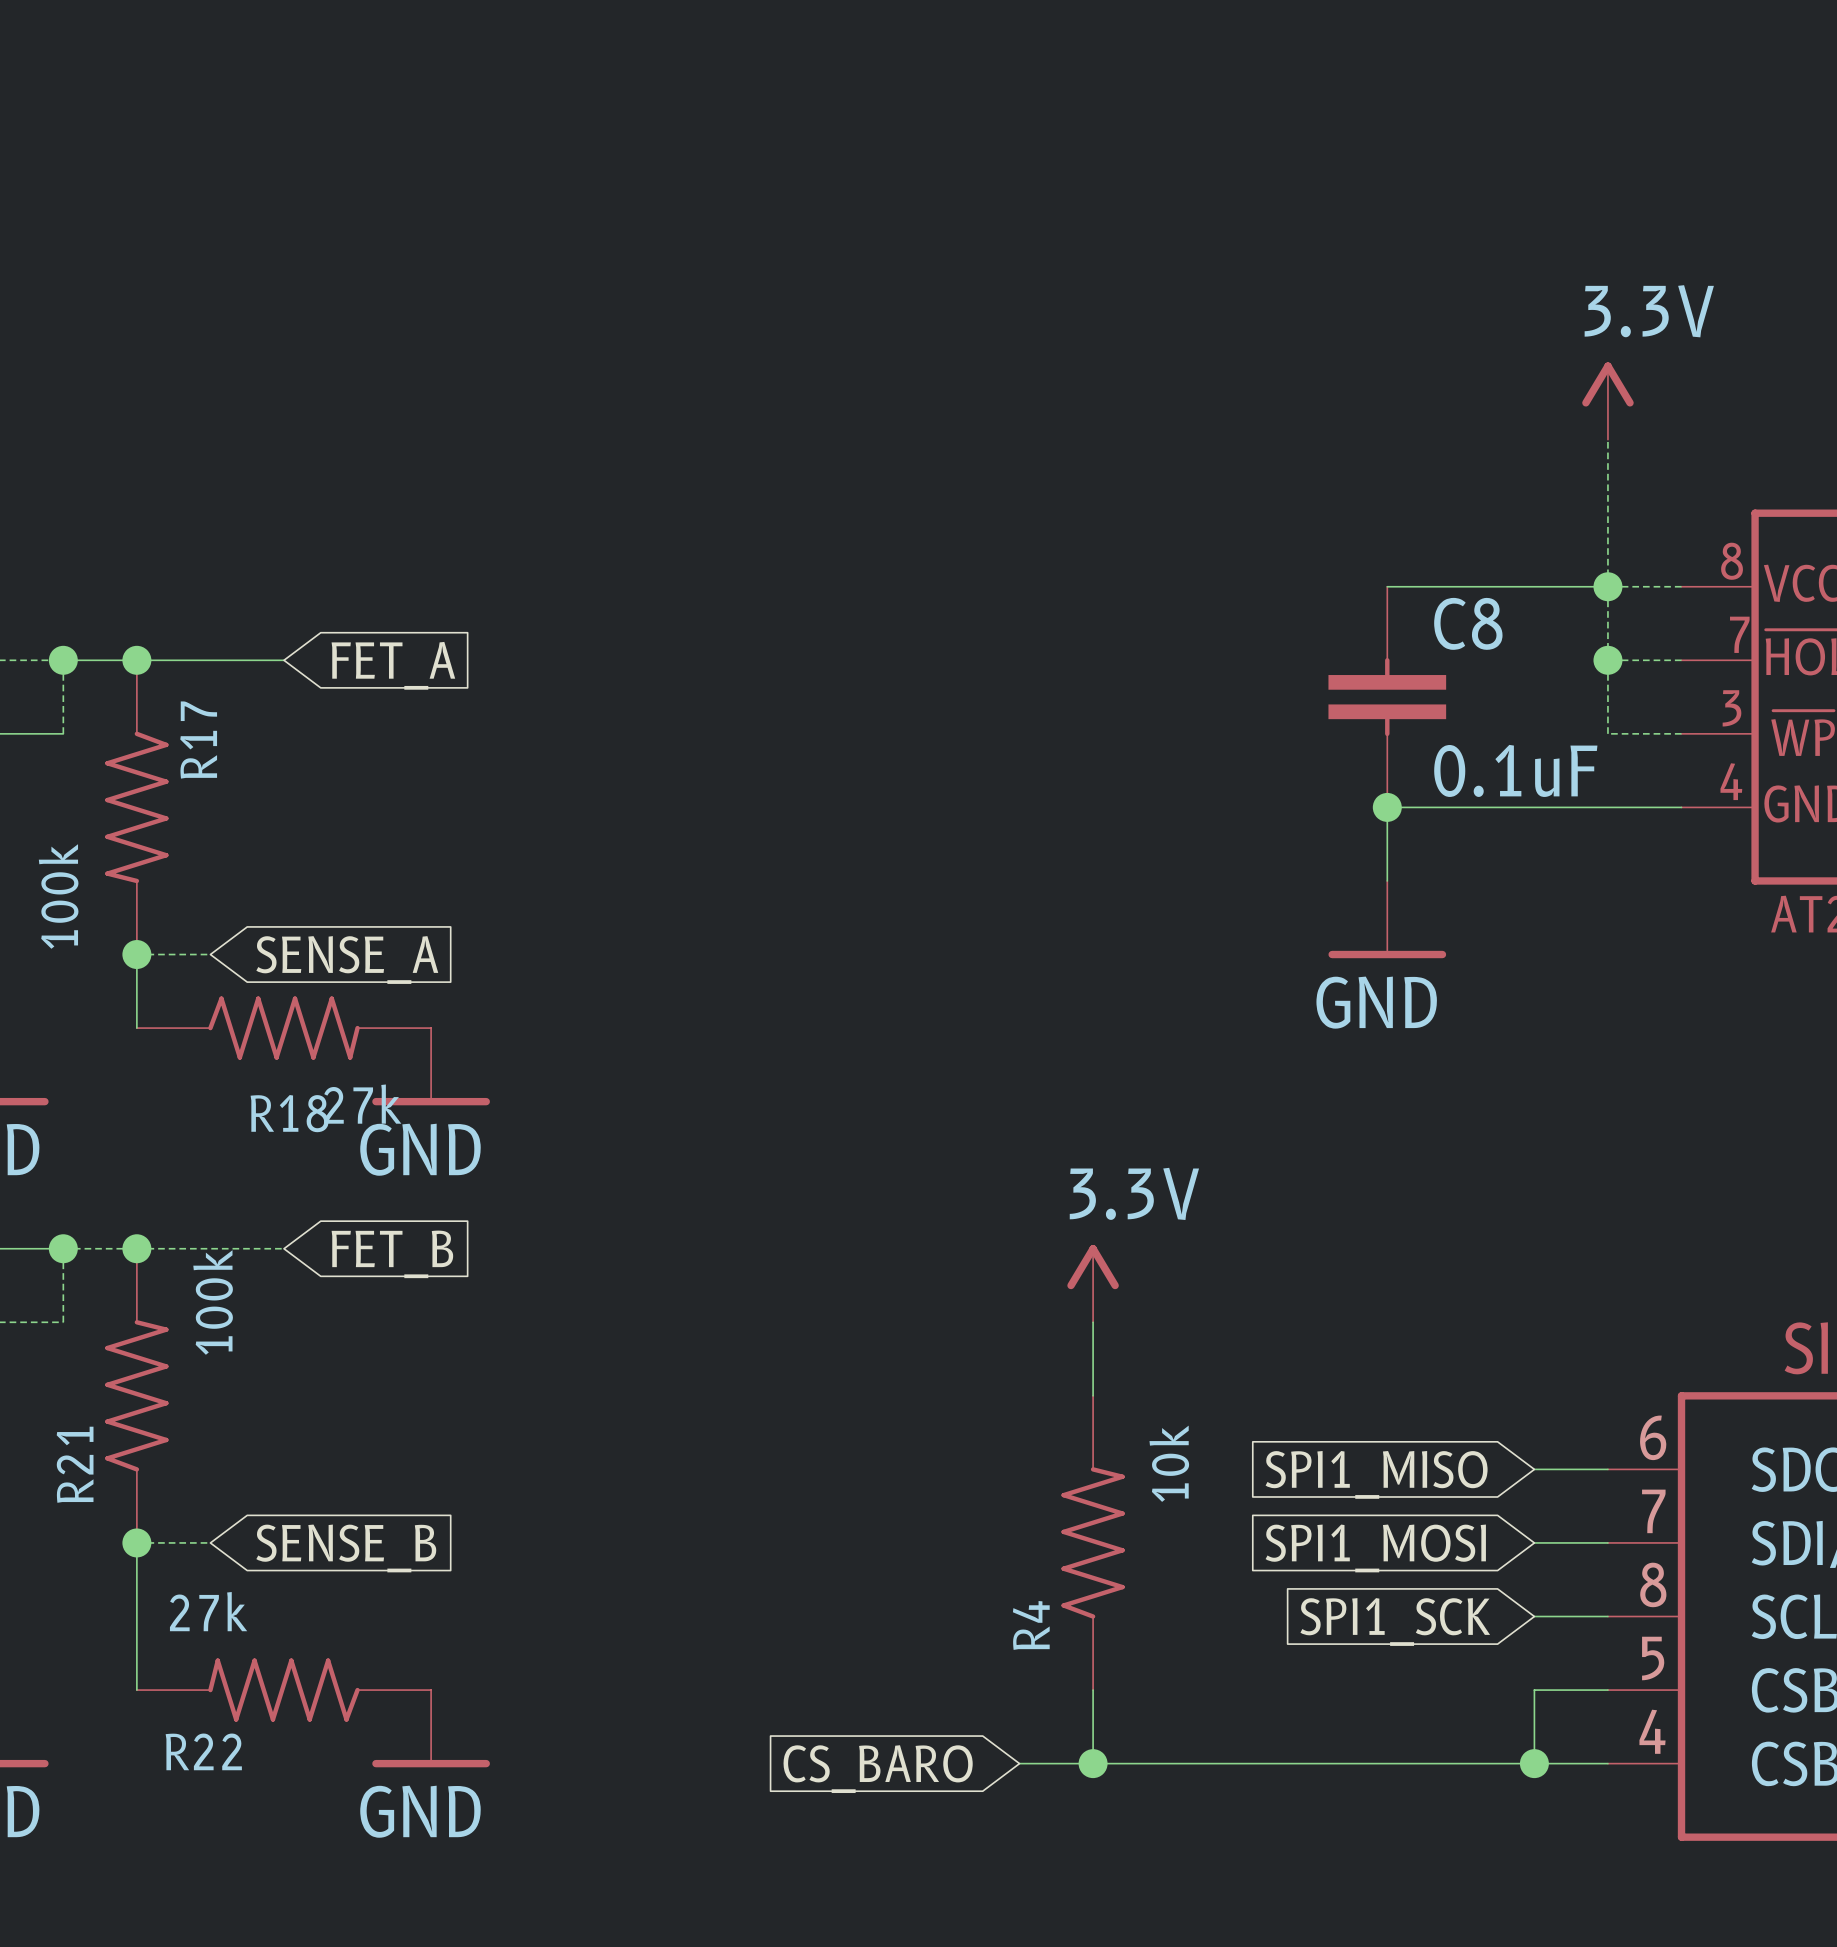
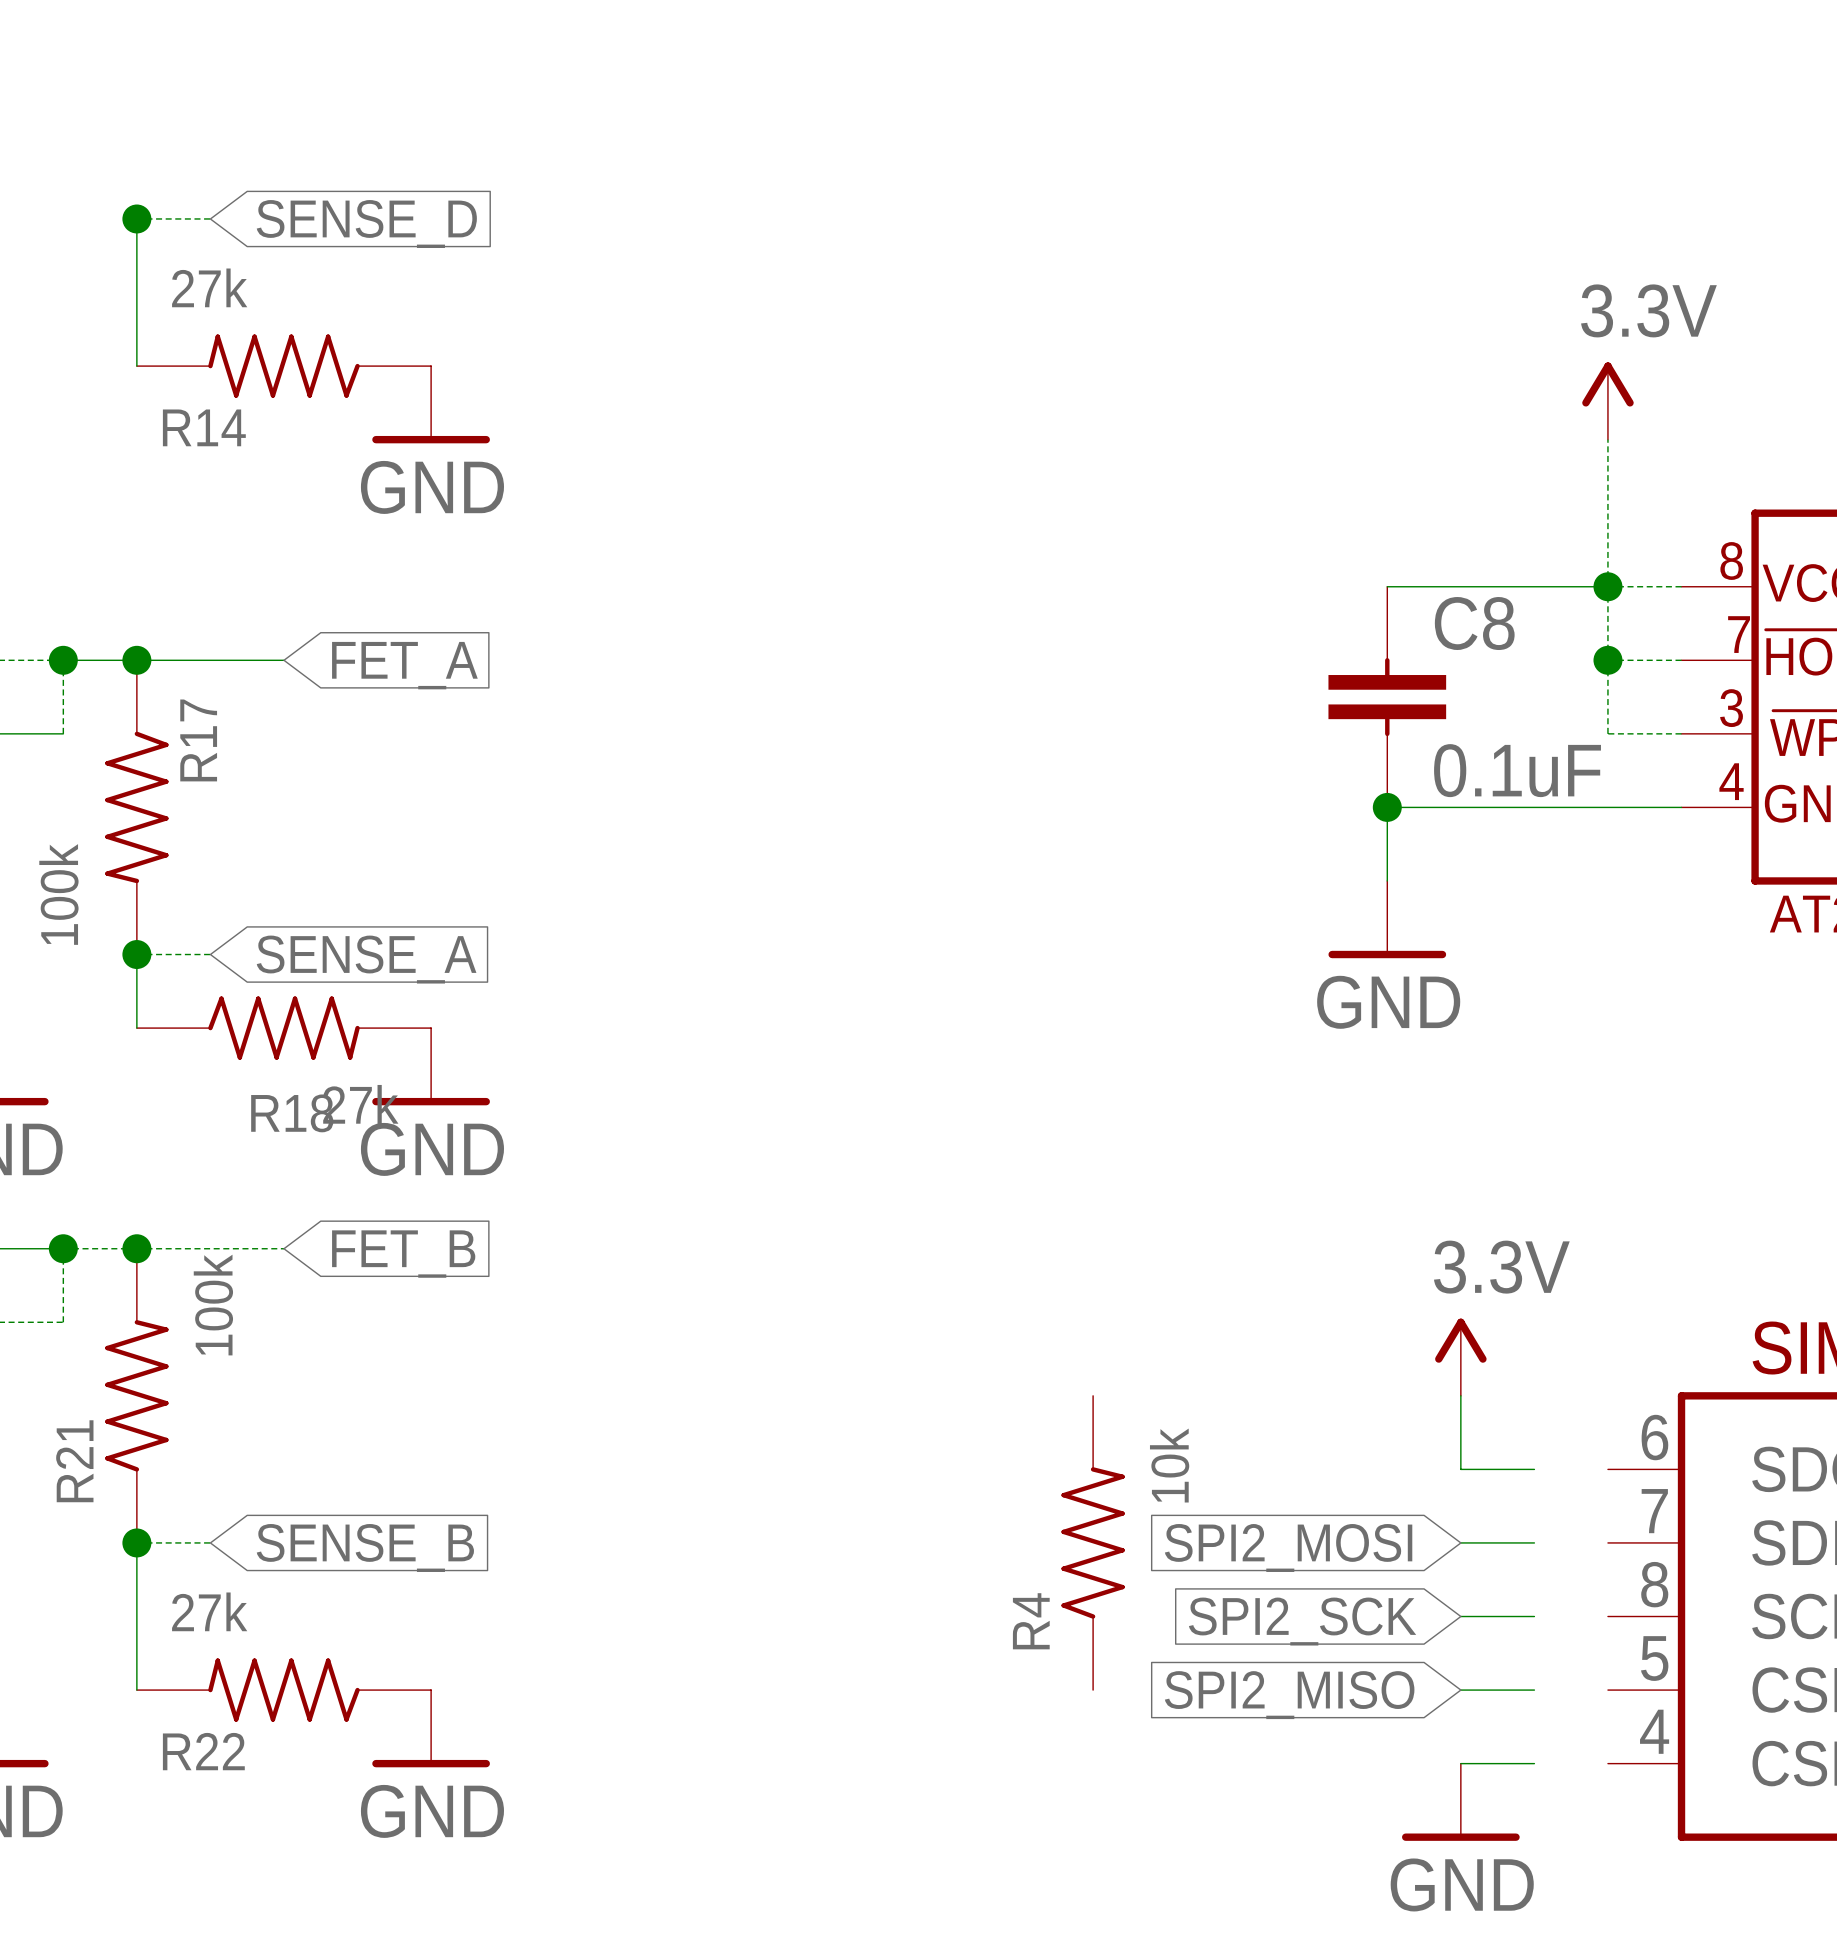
junction: none -> (136, 218)
wire: none -> (210, 218) (136, 218) (136, 366)
global label: none -> SENSE_D (366, 224)
R14: none -> 27k (283, 366)
power symbol: none -> GND (431, 404)
power symbol position: 3.3V (1093, 1283) -> 3.3V (1460, 1357)
wire: (1093, 1322) (1093, 1395) -> none
wire: (1534, 1469) (1607, 1469) -> (1534, 1469) (1460, 1469) (1460, 1395)
global label: SPI1_MISO (1376, 1474) -> none
wire: (1534, 1542) (1607, 1542) -> (1534, 1542) (1460, 1542)
global label: none -> SPI2_MOSI (1288, 1547)
global label: SPI1_MOSI (1375, 1548) -> none
wire: (1534, 1616) (1607, 1616) -> (1534, 1616) (1460, 1616)
global label: SPI1_SCK (1395, 1622) -> SPI2_SCK (1302, 1621)
wire: (1093, 1690) (1093, 1763) -> none
wire: none -> (1460, 1690) (1534, 1690)
wire: (1607, 1690) (1534, 1690) (1534, 1763) (1607, 1763) -> none
global label: none -> SPI2_MISO (1289, 1695)
wire: (1019, 1763) (1460, 1763) -> none
junction: (1093, 1763) -> none
junction: (1534, 1763) -> none
global label: CS_BARO (878, 1769) -> none
power symbol: none -> GND (1460, 1802)

